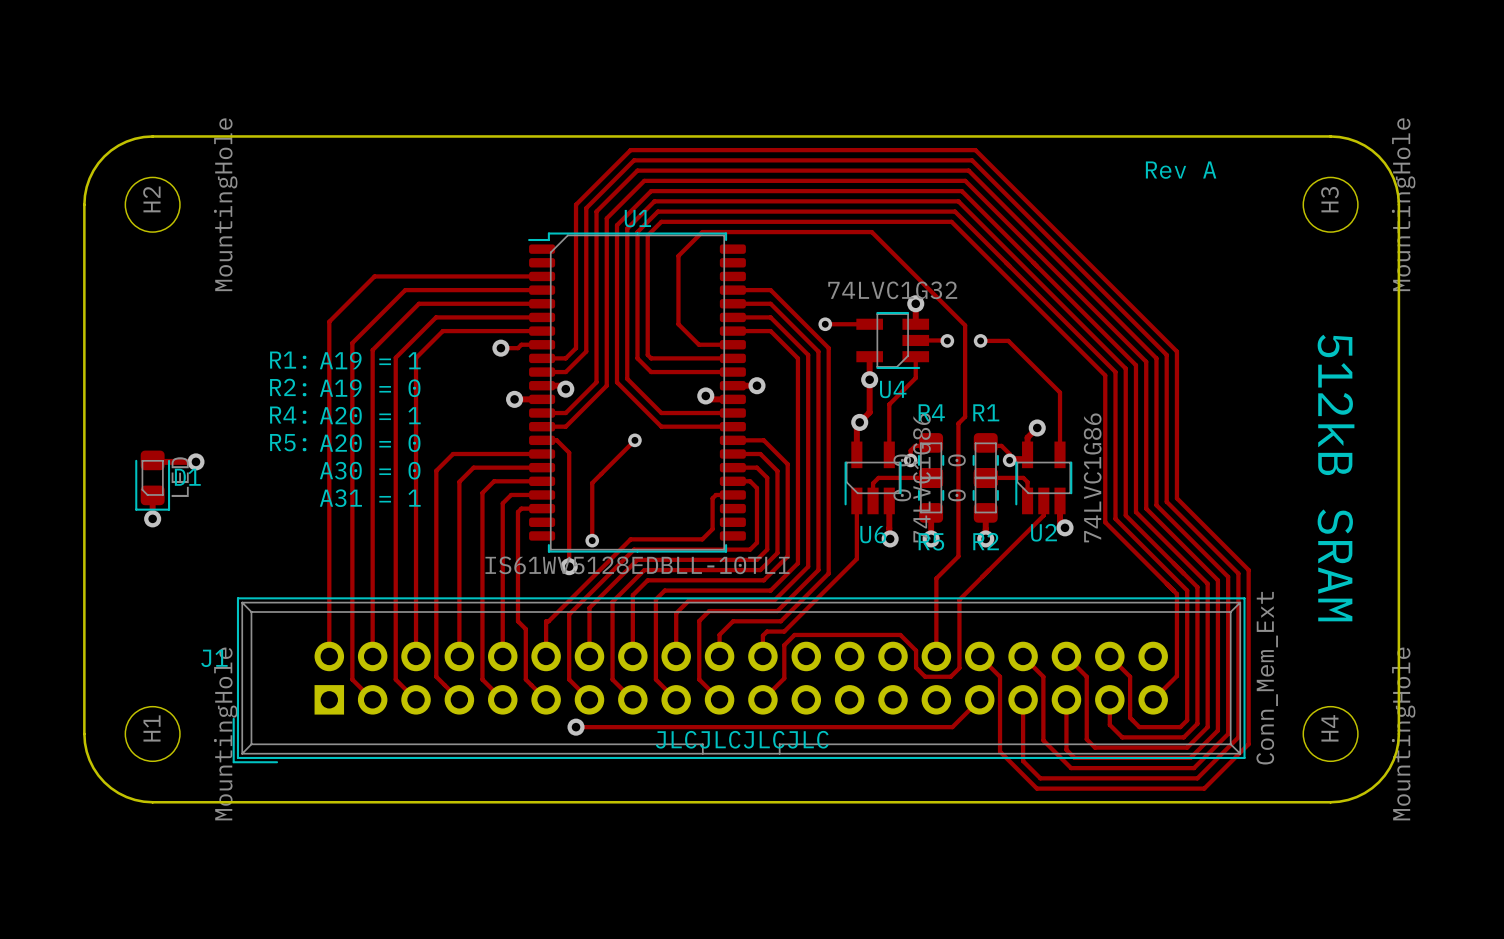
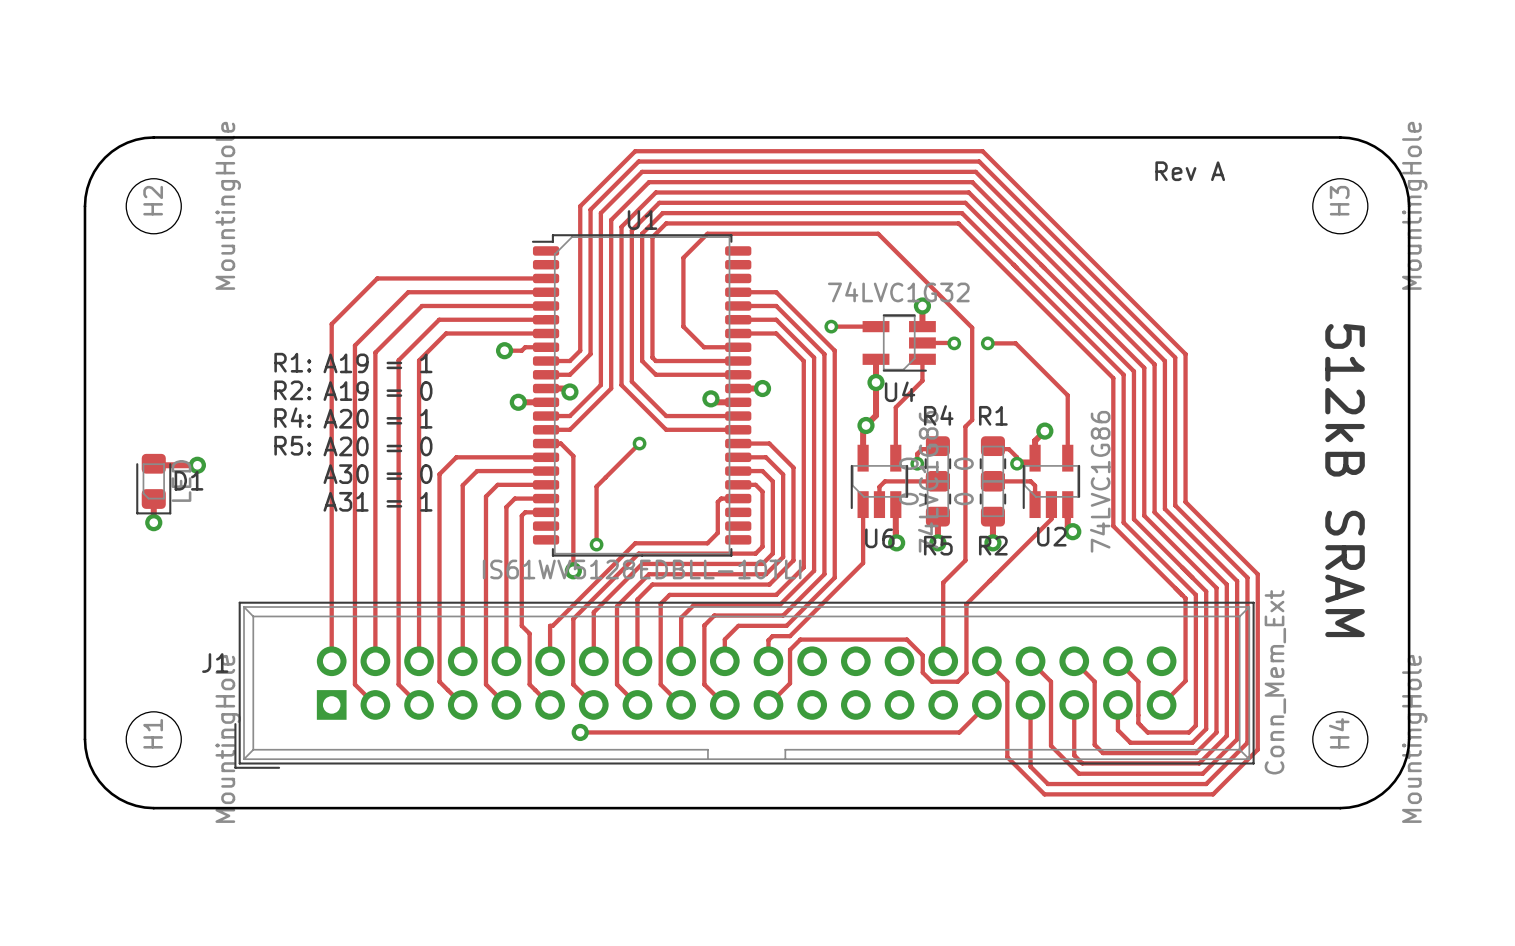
text: JLCJLCJLCJLC (742, 739) -> none

